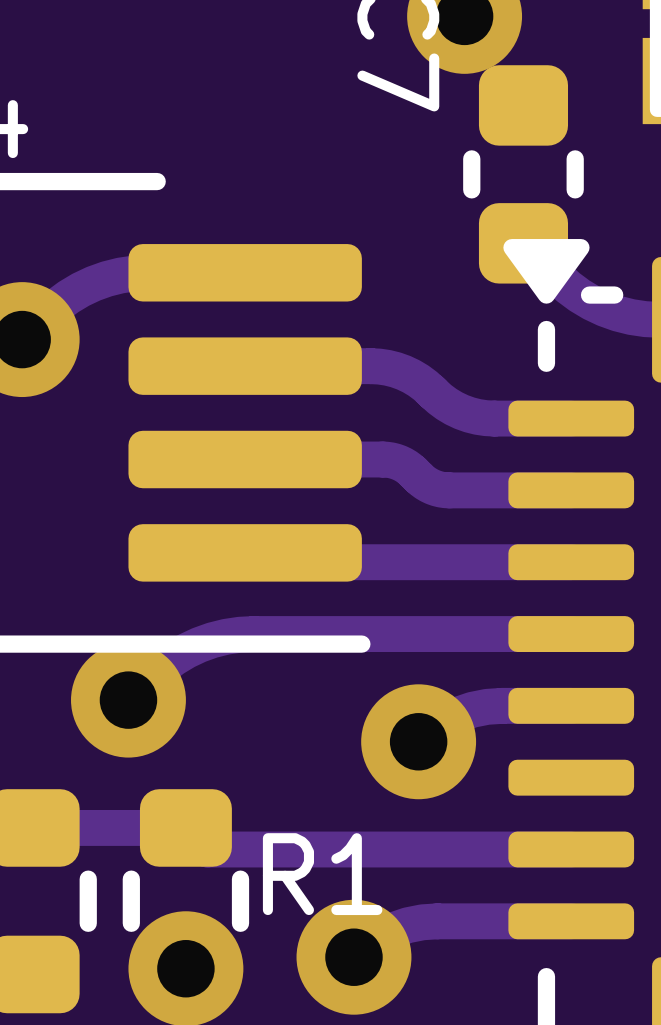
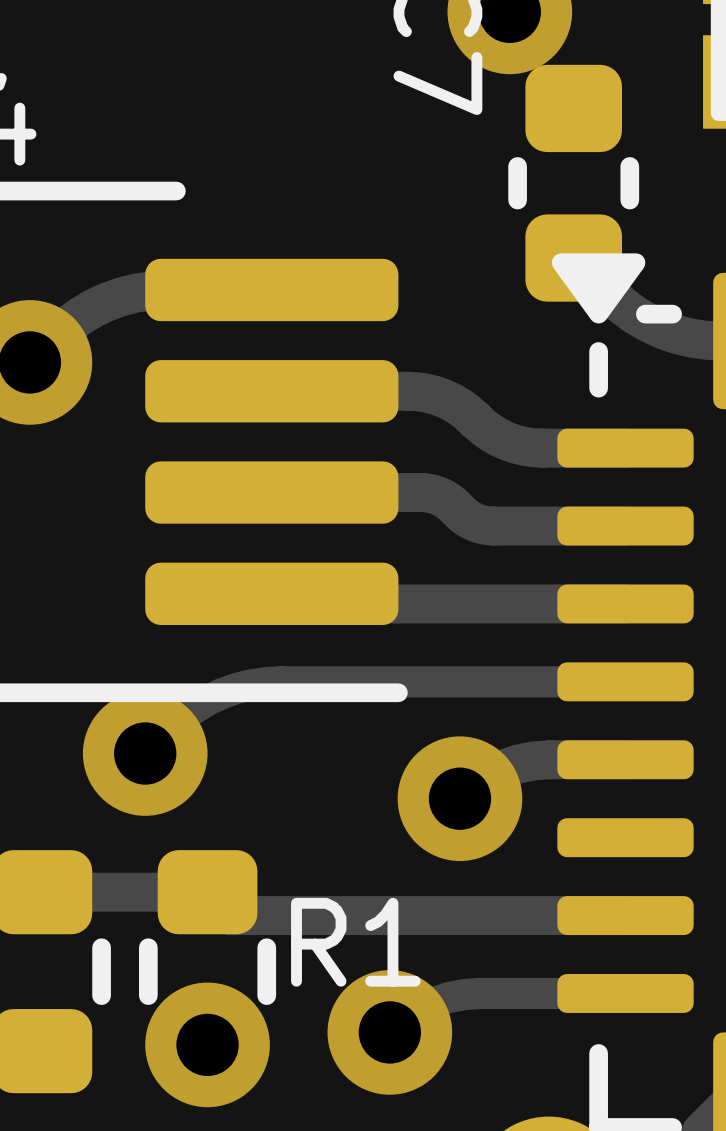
track width: thick (571, 634) (254, 634) (226, 636) (199, 644) (174, 658) (152, 676) (127, 701) -> thin (625, 681) (281, 681) (251, 684) (221, 693) (194, 708) (171, 727) (143, 755)
track width: thick (571, 921) (422, 922) (393, 930) (380, 936) (353, 957) -> thin (625, 993) (464, 994) (432, 1002) (418, 1010) (389, 1032)

